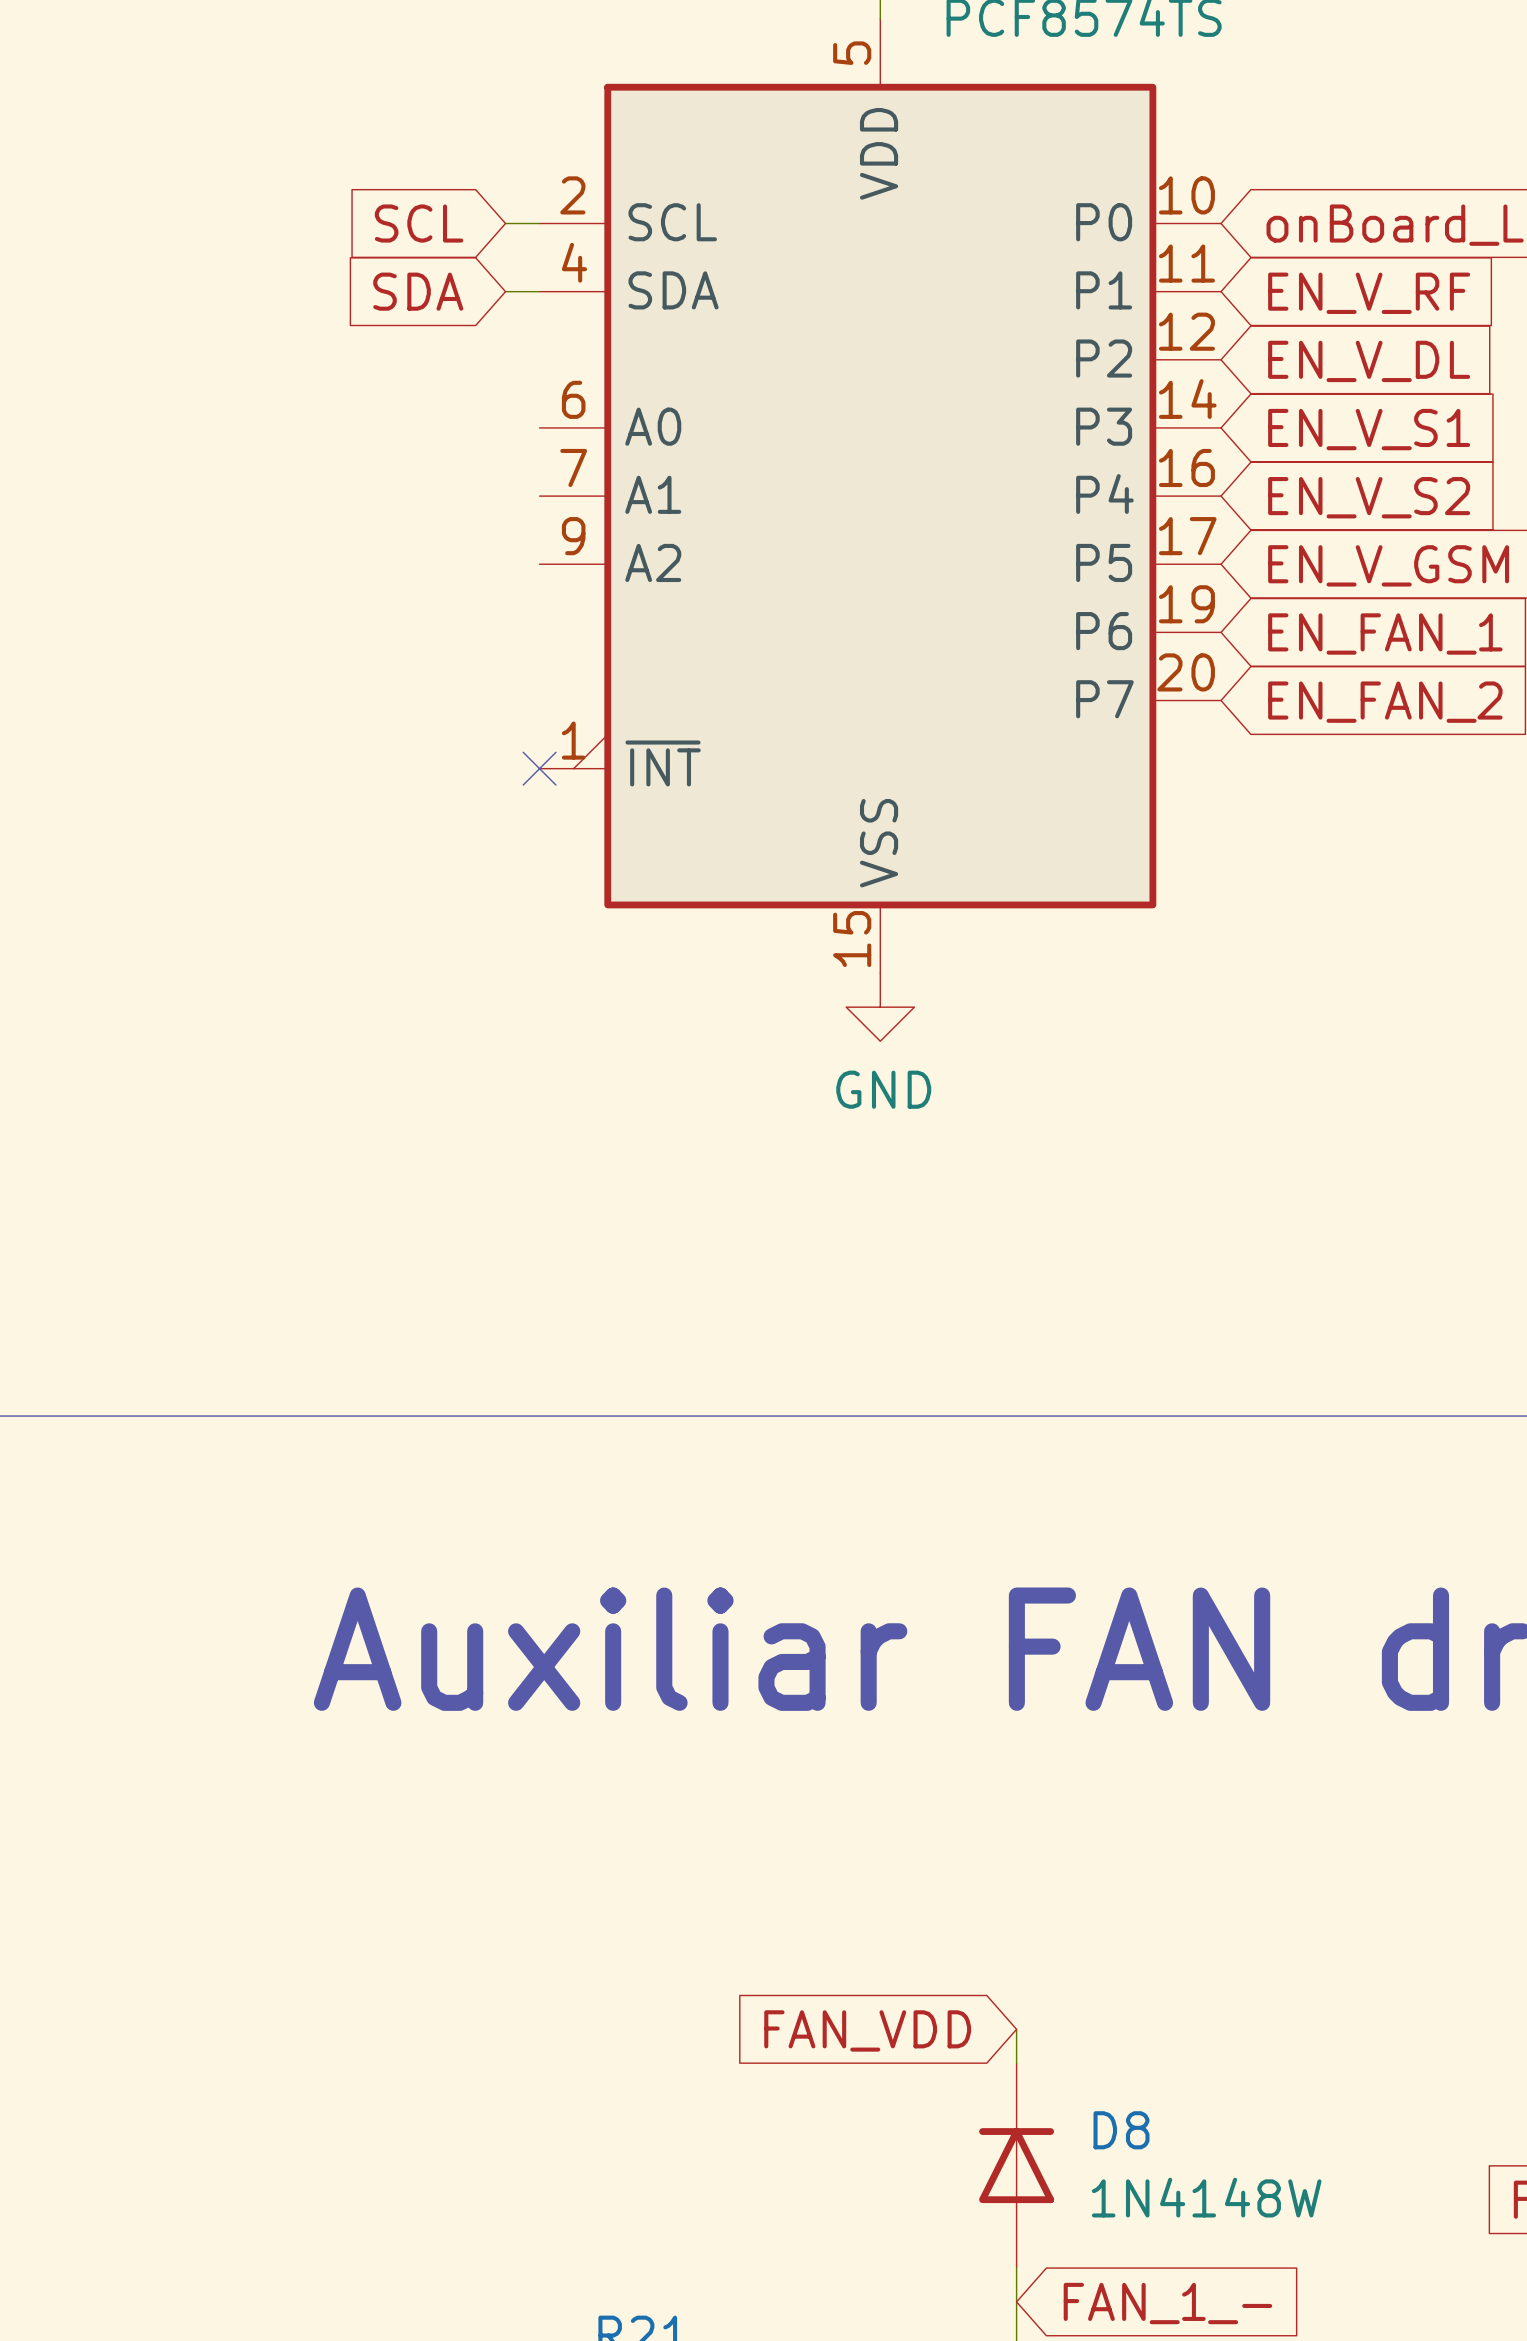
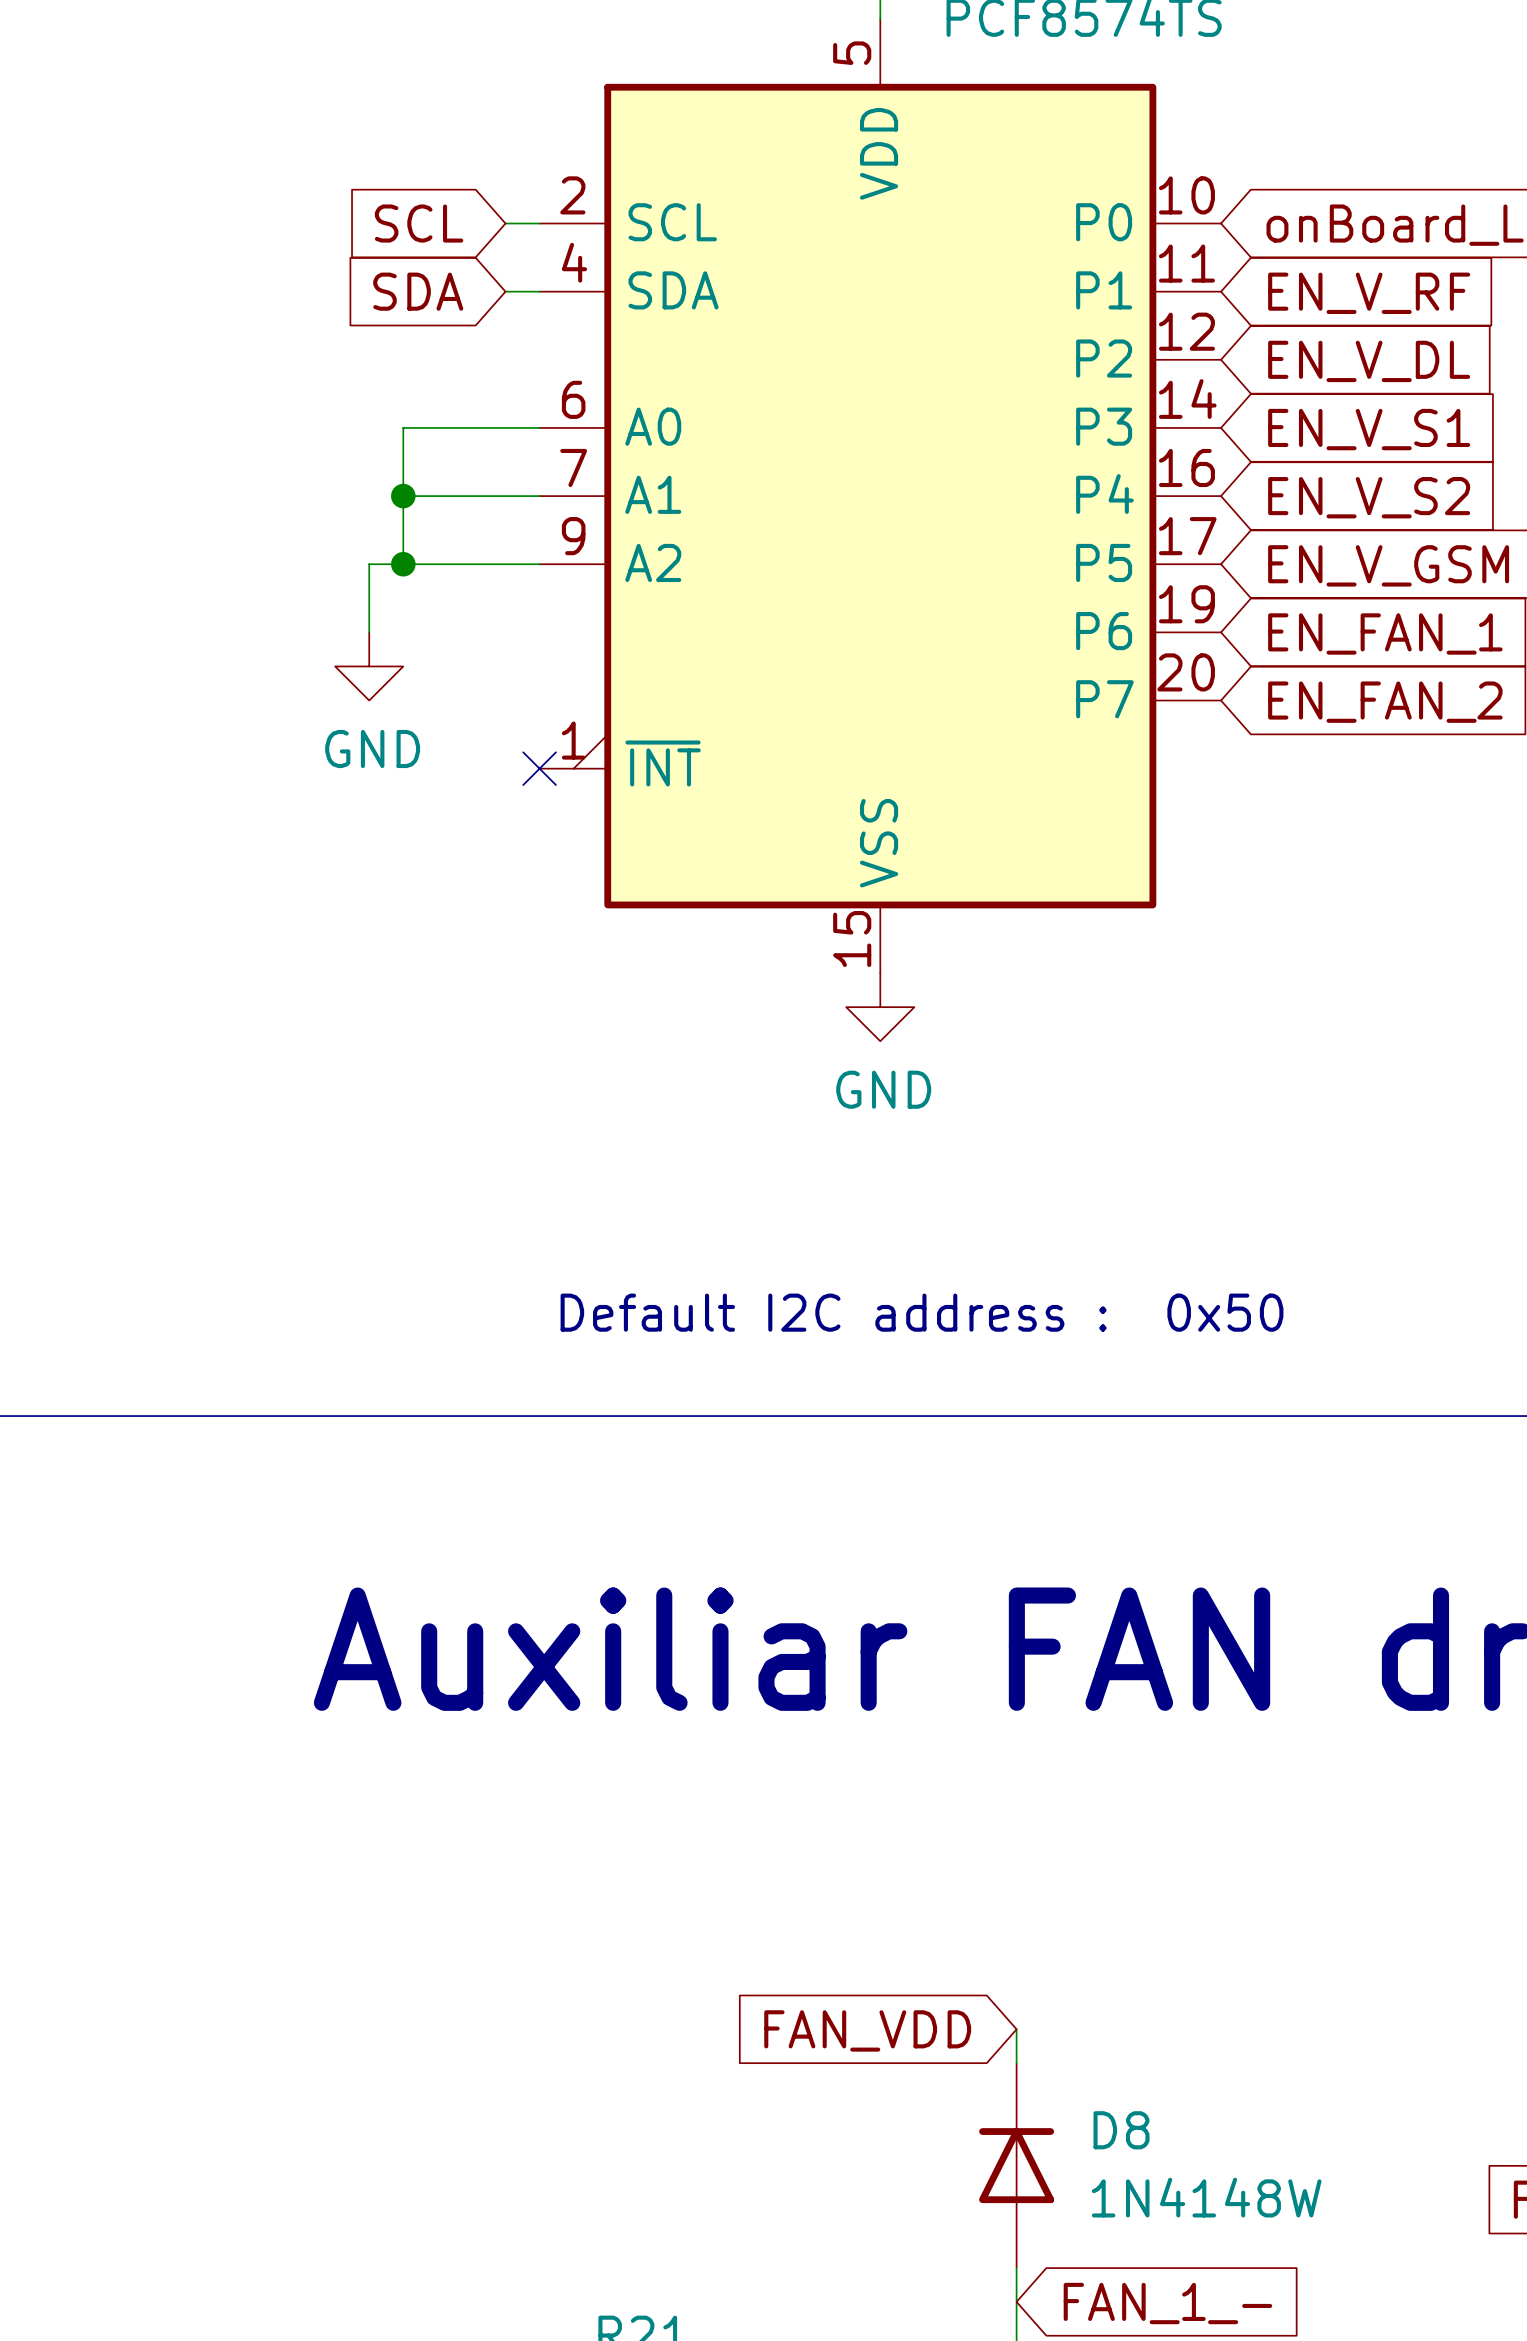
wire: none -> (539, 427) (403, 427) (403, 564)
wire: none -> (403, 496) (539, 496)
junction: none -> (403, 496)
junction: none -> (403, 564)
wire: none -> (539, 564) (369, 564) (369, 632)
power symbol: none -> GND (369, 666)
text: none -> Default I2C address : 0x50 (922, 1312)

